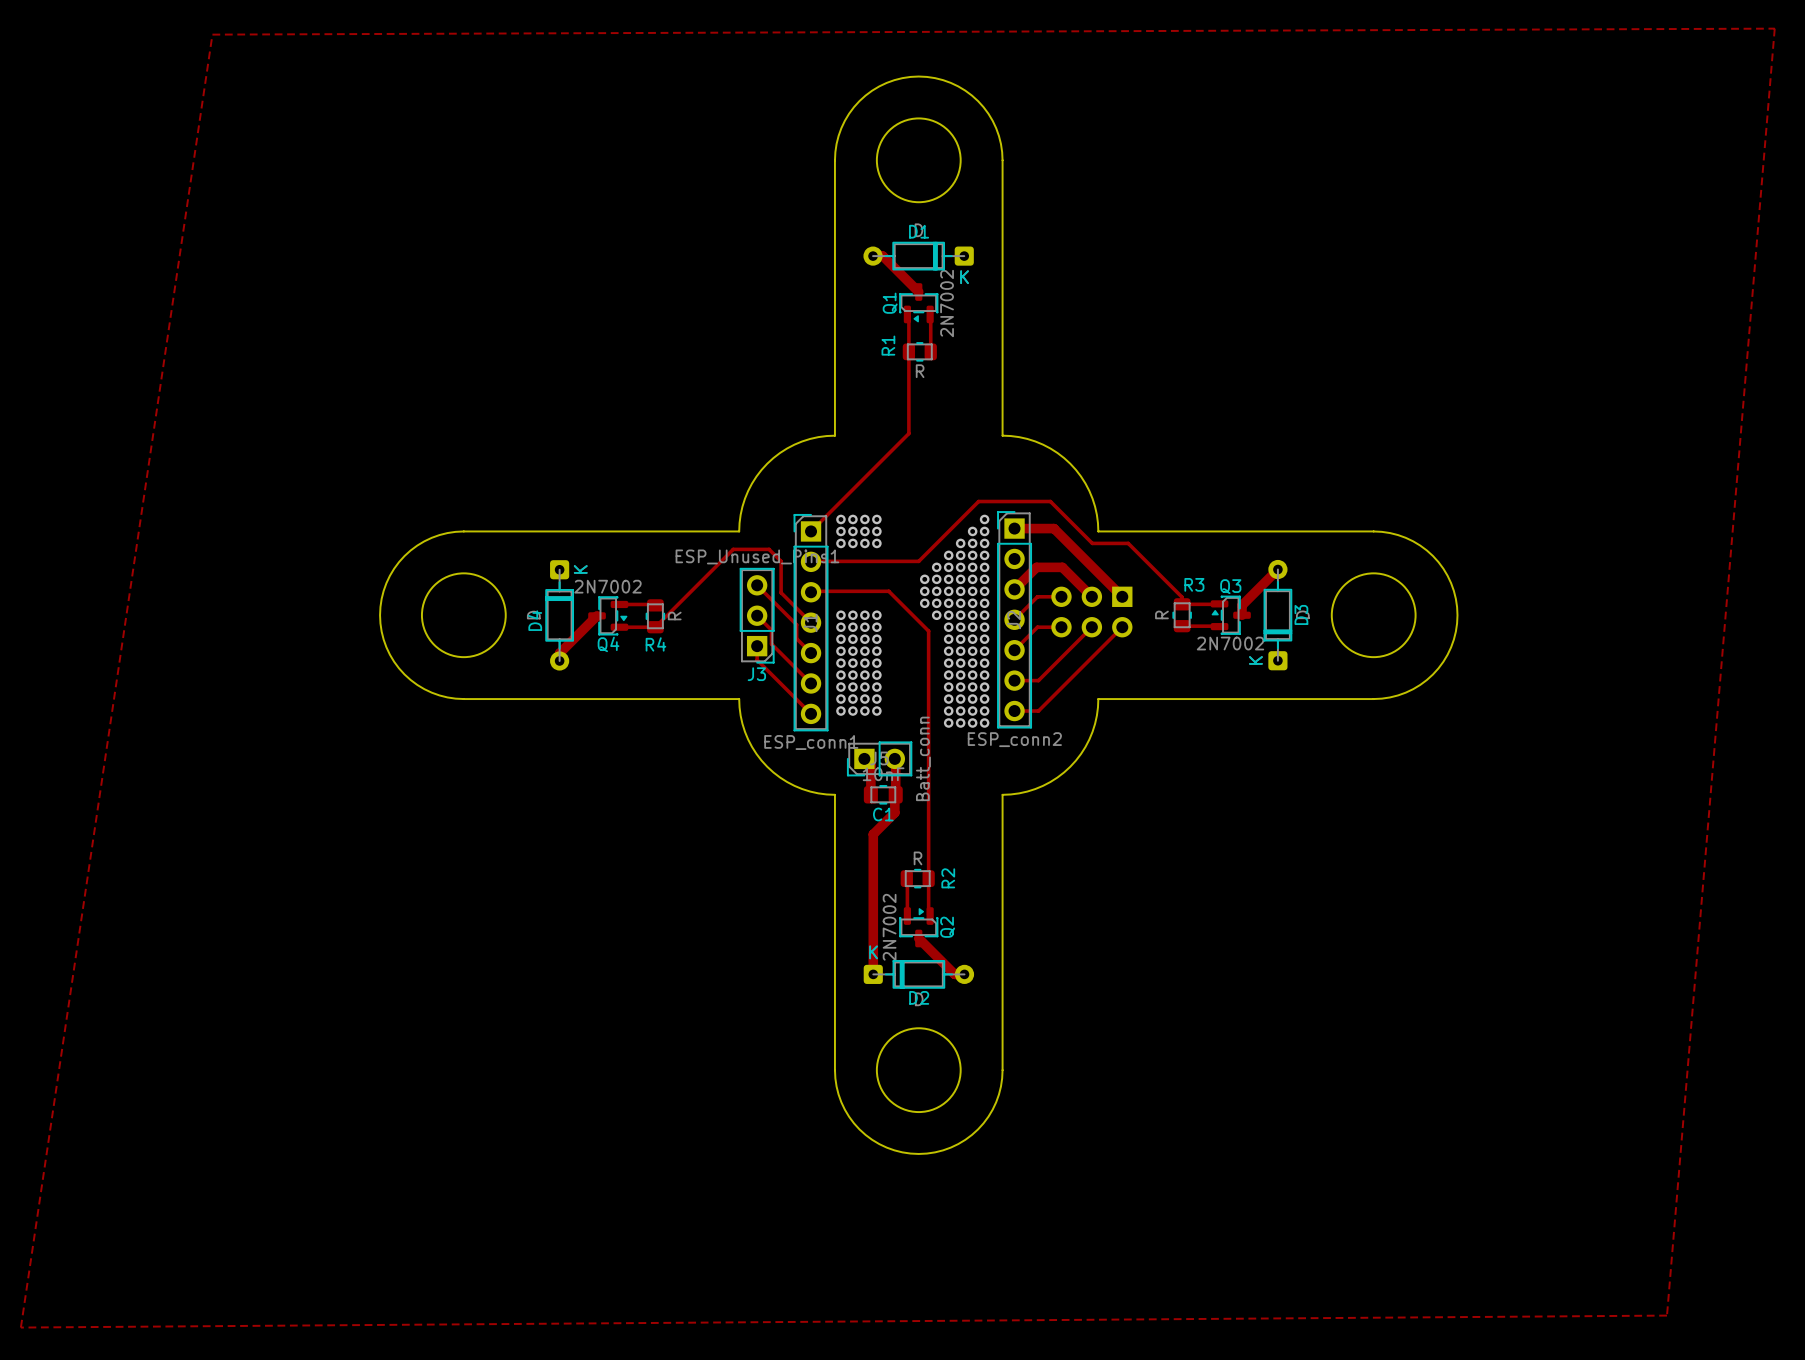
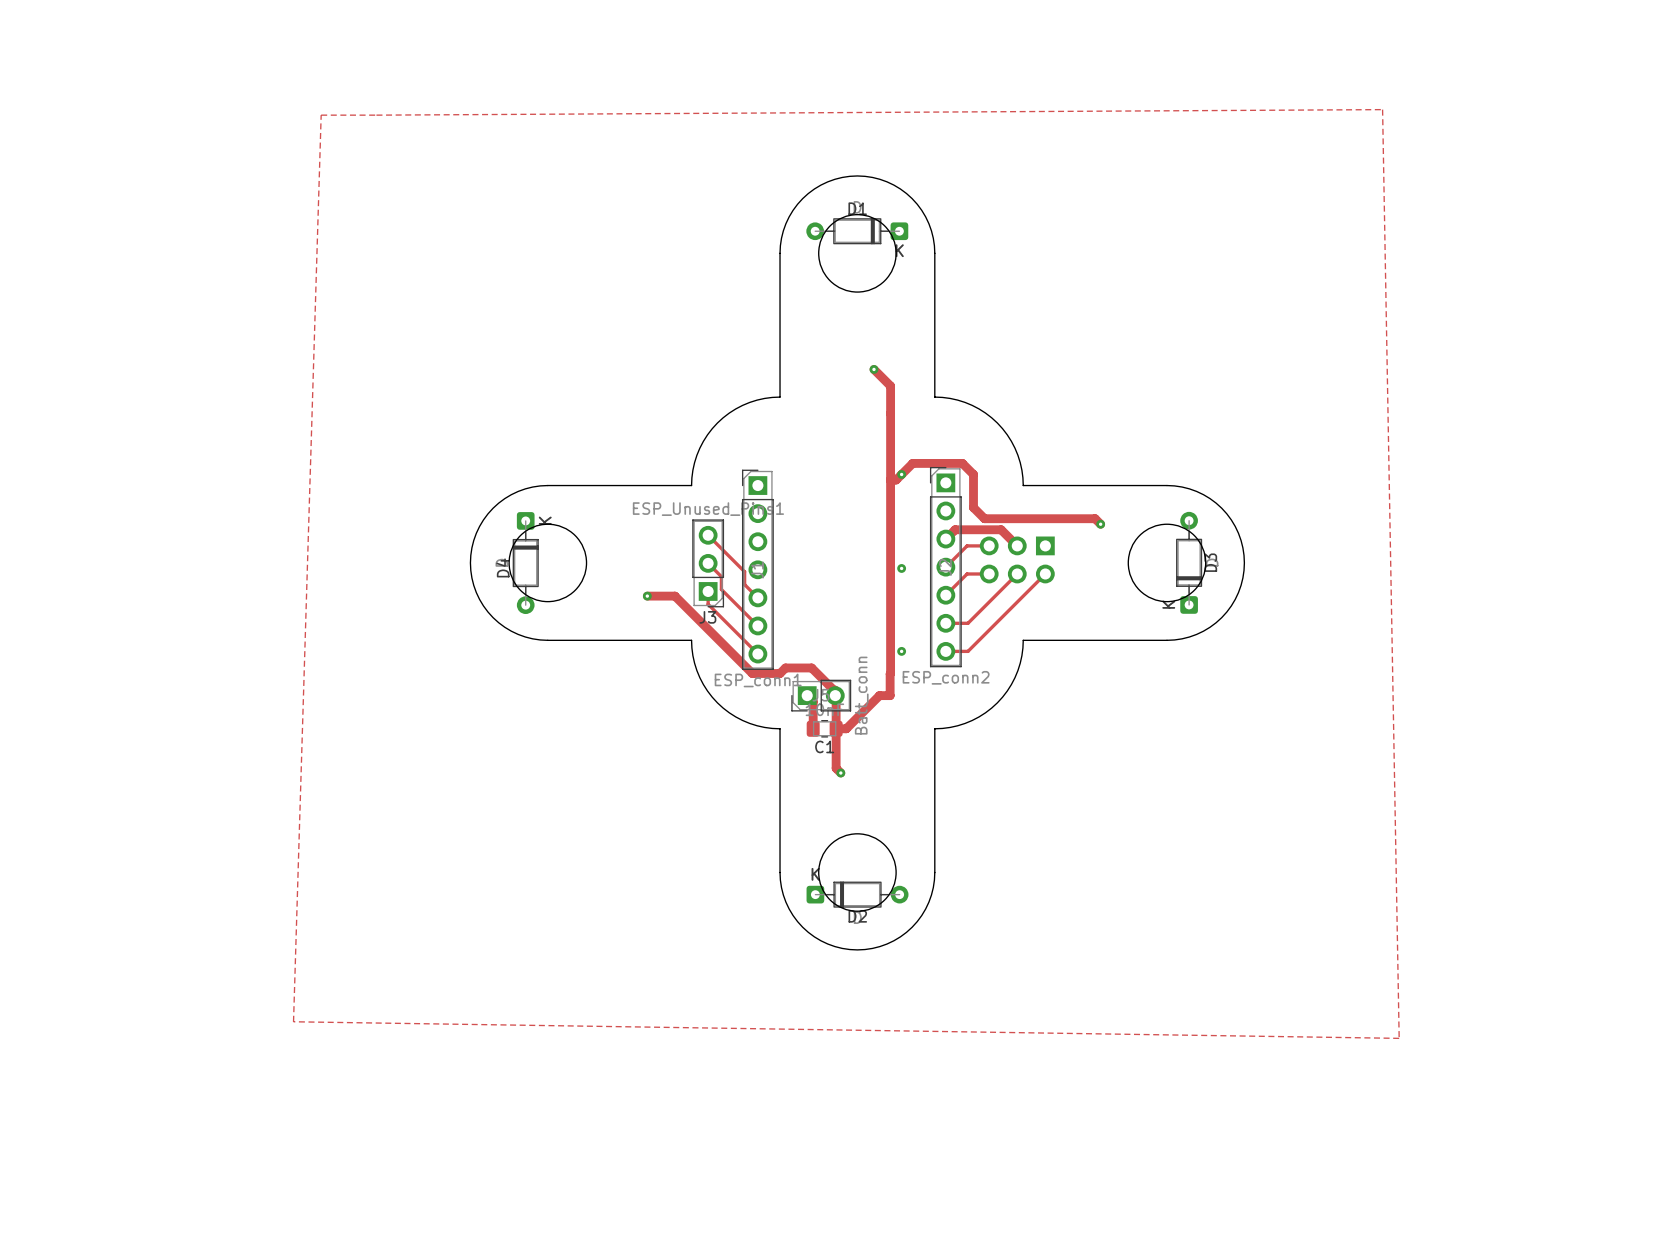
zone outline: (1774, 28) (212, 34) (20, 1327) (1667, 1315) (1774, 28) -> (1382, 109) (321, 115) (293, 1021) (1399, 1038) (1382, 109)
round board edge position: (918, 160) -> (857, 253)
track: (873, 256) (882, 256) (918, 292) -> none
board edge: (834, 280) (834, 160) (836, 143) (841, 128) (853, 107) (872, 90) (894, 80) (918, 76) (943, 80) (965, 90) (983, 107) (996, 128) (1000, 143) (1002, 160) (1002, 280) -> (780, 253) (785, 223) (802, 198) (827, 181) (857, 175) (887, 181) (912, 198) (928, 223) (934, 253)
Q1: 2N7002 (918, 303) -> none
track: (907, 314) (908, 433) (811, 531) -> none
track: (930, 314) (930, 351) -> none
R1: R (919, 351) -> none
track: none -> (873, 369) (890, 386) (890, 695) (879, 695) (846, 728) (836, 728) (836, 768) (840, 773)
via: none -> (873, 369)
via: (840, 519) -> none
via: (852, 519) -> none
via: (864, 519) -> none
via: (876, 519) -> none
via: none -> (901, 474)
via: (984, 519) -> none
track: none -> (890, 480) (896, 480) (912, 463) (962, 463) (973, 474) (973, 507) (984, 518)
track: (1014, 528) (1054, 528) (1122, 596) -> none
board edge: (583, 531) (463, 531) (447, 533) (431, 537) (410, 550) (394, 568) (383, 590) (380, 615) (383, 639) (394, 661) (410, 680) (431, 692) (447, 697) (463, 699) (583, 699) -> (547, 485) (518, 491) (493, 508) (476, 533) (470, 562) (476, 592) (493, 617) (518, 634) (547, 640)
via: (840, 531) -> none
via: (852, 531) -> none
via: (864, 531) -> none
via: (876, 531) -> none
via: (972, 531) -> none
via: (984, 531) -> none
board edge: (1253, 531) (1373, 531) (1390, 533) (1405, 537) (1426, 550) (1443, 568) (1453, 590) (1457, 615) (1453, 639) (1443, 661) (1426, 680) (1405, 692) (1390, 697) (1373, 699) (1253, 699) -> (1166, 485) (1196, 491) (1221, 508) (1238, 533) (1244, 562) (1238, 592) (1221, 617) (1196, 634) (1166, 640)
via: (840, 543) -> none
via: (852, 543) -> none
via: (864, 543) -> none
via: (876, 543) -> none
via: (960, 543) -> none
via: (972, 543) -> none
via: (984, 543) -> none
via: (948, 555) -> none
via: (960, 555) -> none
via: (972, 555) -> none
via: (984, 555) -> none
track: (811, 561) (918, 561) (978, 501) (1050, 501) (1092, 543) (1128, 543) (1182, 597) (1182, 604) (1219, 603) -> none
via: (936, 567) -> none
via: (948, 567) -> none
via: (960, 567) -> none
via: (972, 567) -> none
via: (984, 567) -> none
track: (1056, 567) (1036, 567) (1024, 579) -> (1001, 529) (955, 529)
track: (1062, 567) (1074, 579) -> (990, 518) (1095, 518) (1100, 524)
track: (1277, 569) (1242, 605) (1242, 615) -> none
via: none -> (1100, 524)
via: (924, 579) -> none
via: (936, 579) -> none
via: (948, 579) -> none
via: (960, 579) -> none
via: (972, 579) -> none
via: (984, 579) -> none
track: (811, 591) (888, 591) (928, 631) (930, 916) -> none
via: (924, 591) -> none
via: (936, 591) -> none
via: (948, 591) -> none
via: (960, 591) -> none
via: (972, 591) -> none
via: (984, 591) -> none
via: (924, 603) -> none
via: (936, 603) -> none
via: (948, 603) -> none
via: (960, 603) -> none
via: (972, 603) -> none
via: (984, 603) -> none
track: (619, 604) (655, 605) -> none
round board edge position: (463, 615) -> (547, 562)
track: (597, 615) (559, 653) (559, 660) -> none
Q4: 2N7002 (608, 615) -> none
via: (840, 615) -> none
via: (852, 615) -> none
via: (864, 615) -> none
via: (876, 615) -> none
via: (936, 615) -> none
via: (948, 615) -> none
via: (960, 615) -> none
via: (972, 615) -> none
via: (984, 615) -> none
R3: R (1182, 615) -> none
Q3: 2N7002 (1230, 615) -> none
round board edge position: (1373, 615) -> (1166, 562)
R4: R (655, 616) -> none
via: none -> (901, 568)
track: (811, 622) (781, 592) (781, 561) (769, 549) (733, 549) (655, 627) (619, 627) -> none
track: (1182, 626) (1219, 626) -> none
via: (840, 627) -> none
via: (852, 627) -> none
via: (864, 627) -> none
via: (876, 627) -> none
via: (948, 627) -> none
via: (960, 627) -> none
via: (972, 627) -> none
via: (984, 627) -> none
via: (840, 639) -> none
via: (852, 639) -> none
via: (864, 639) -> none
via: (876, 639) -> none
via: (948, 639) -> none
via: (960, 639) -> none
via: (972, 639) -> none
via: (984, 639) -> none
track: none -> (647, 596) (674, 596) (752, 673) (780, 673) (785, 667) (811, 667) (835, 691)
via: none -> (647, 596)
via: (840, 651) -> none
via: (852, 651) -> none
via: (864, 651) -> none
via: (876, 651) -> none
via: (948, 651) -> none
via: (960, 651) -> none
via: (972, 651) -> none
via: (984, 651) -> none
via: (840, 663) -> none
via: (852, 663) -> none
via: (864, 663) -> none
via: (876, 663) -> none
via: (948, 663) -> none
via: (960, 663) -> none
via: (972, 663) -> none
via: (984, 663) -> none
via: (840, 675) -> none
via: (852, 675) -> none
via: (864, 675) -> none
via: (876, 675) -> none
via: (948, 675) -> none
via: (960, 675) -> none
via: (972, 675) -> none
via: (984, 675) -> none
via: (840, 687) -> none
via: (852, 687) -> none
via: (864, 687) -> none
via: (876, 687) -> none
via: (948, 687) -> none
via: (960, 687) -> none
via: (972, 687) -> none
via: (984, 687) -> none
via: (840, 699) -> none
via: (852, 699) -> none
via: (864, 699) -> none
via: (876, 699) -> none
via: (948, 699) -> none
via: (960, 699) -> none
via: (972, 699) -> none
via: (984, 699) -> none
via: (840, 711) -> none
via: (852, 711) -> none
via: (864, 711) -> none
via: (876, 711) -> none
via: (948, 711) -> none
via: (960, 711) -> none
via: none -> (901, 651)
via: (972, 711) -> none
via: (984, 711) -> none
via: (948, 722) -> none
via: (960, 722) -> none
via: (972, 722) -> none
via: (984, 722) -> none
track: (894, 795) (894, 812) (873, 834) (873, 974) -> none
via: none -> (840, 773)
track: (906, 878) (907, 916) -> none
R2: R (917, 878) -> none
Q2: 2N7002 (918, 927) -> none
track: (918, 938) (954, 974) (964, 974) -> none
board edge: (834, 950) (834, 1070) (836, 1086) (841, 1102) (853, 1123) (872, 1139) (894, 1150) (918, 1153) (943, 1150) (965, 1139) (983, 1123) (996, 1102) (1000, 1086) (1002, 1070) (1002, 950) -> (780, 872) (785, 902) (802, 927) (827, 944) (857, 949) (887, 944) (912, 927) (928, 902) (934, 872)
round board edge position: (918, 1070) -> (857, 872)

